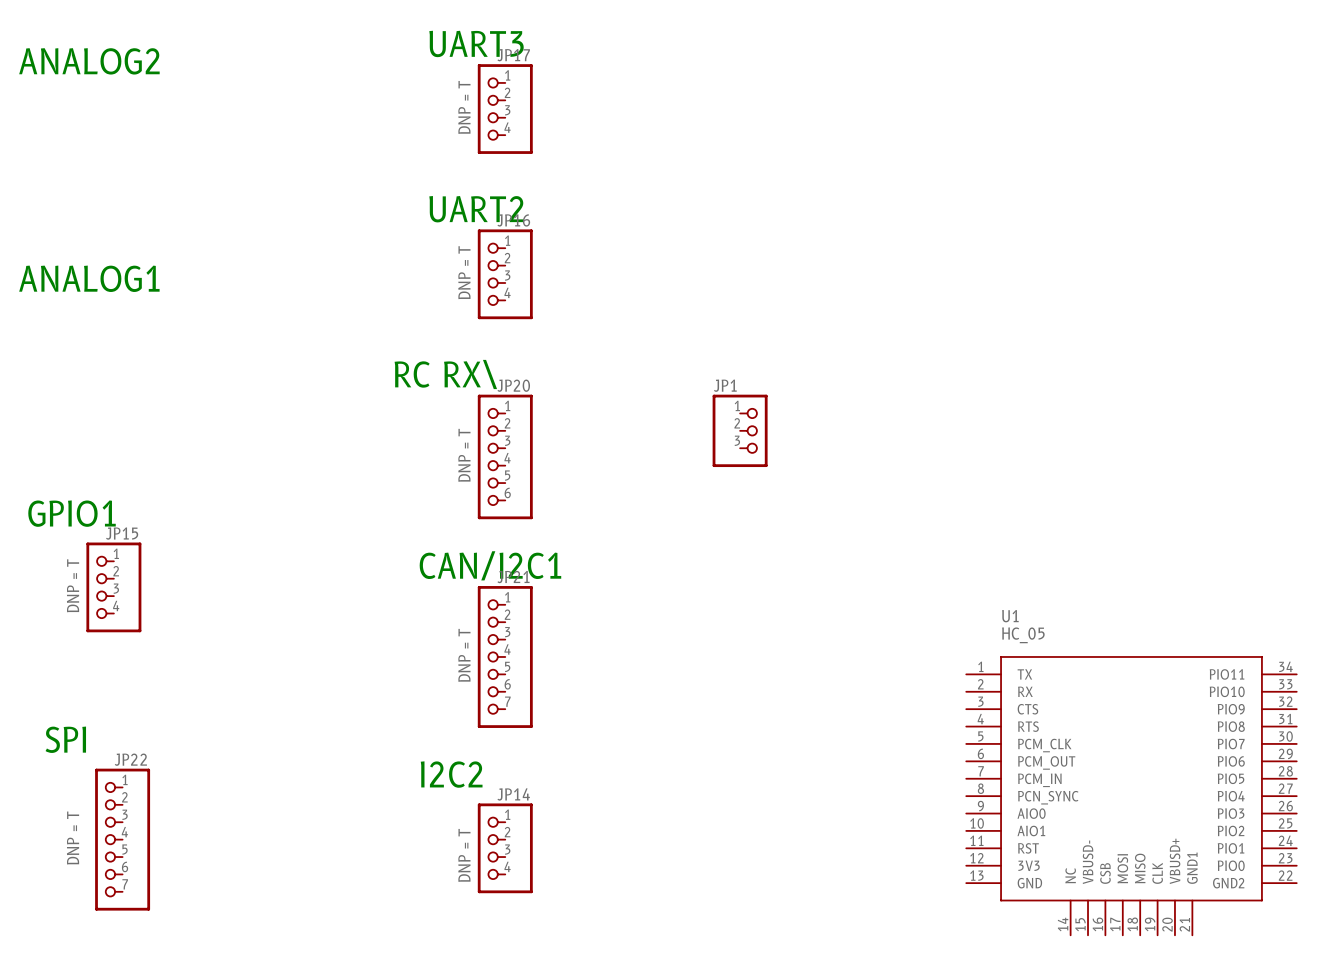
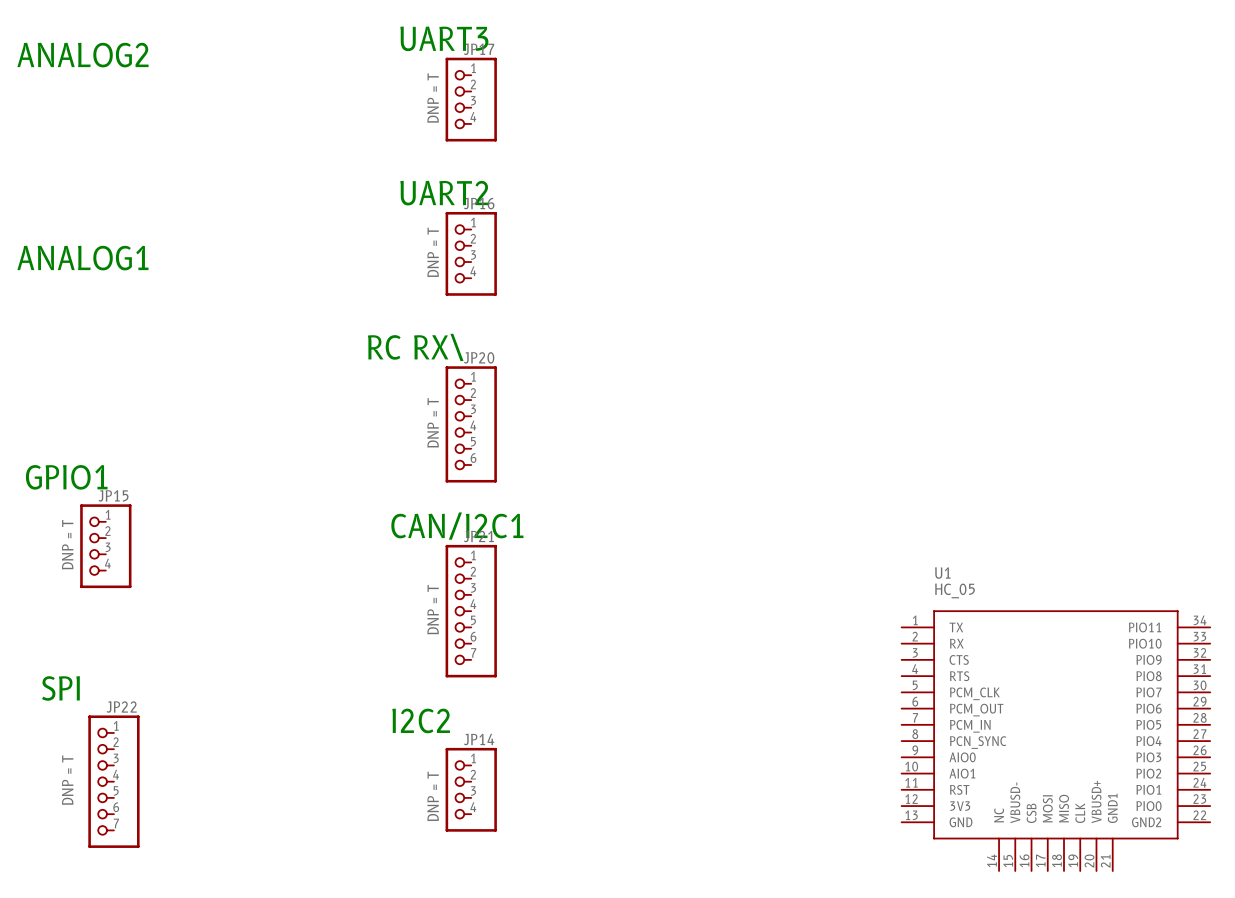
JP1: (740, 430) -> none

